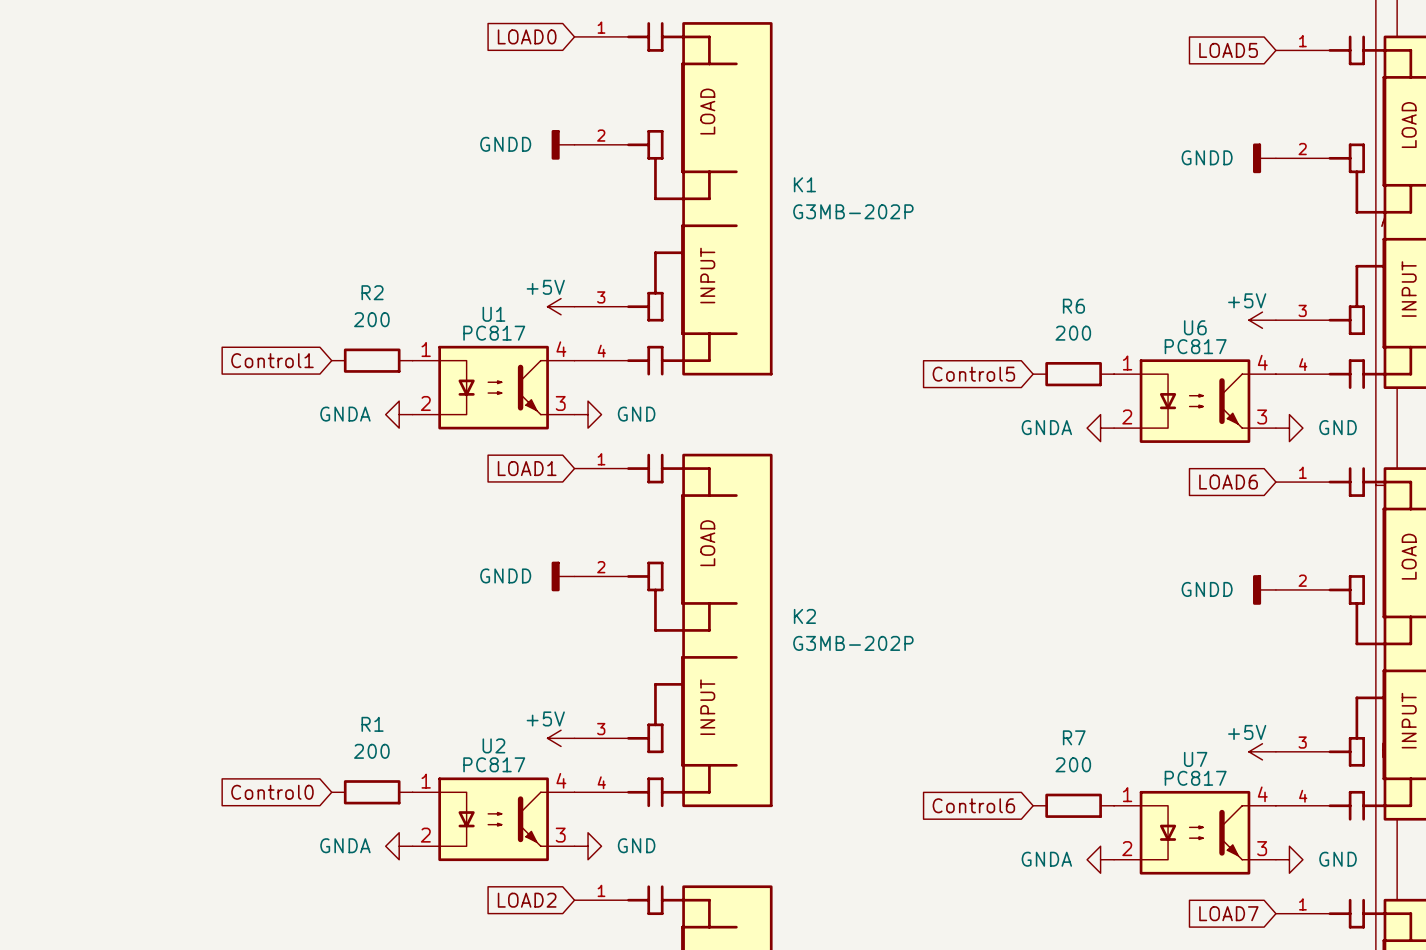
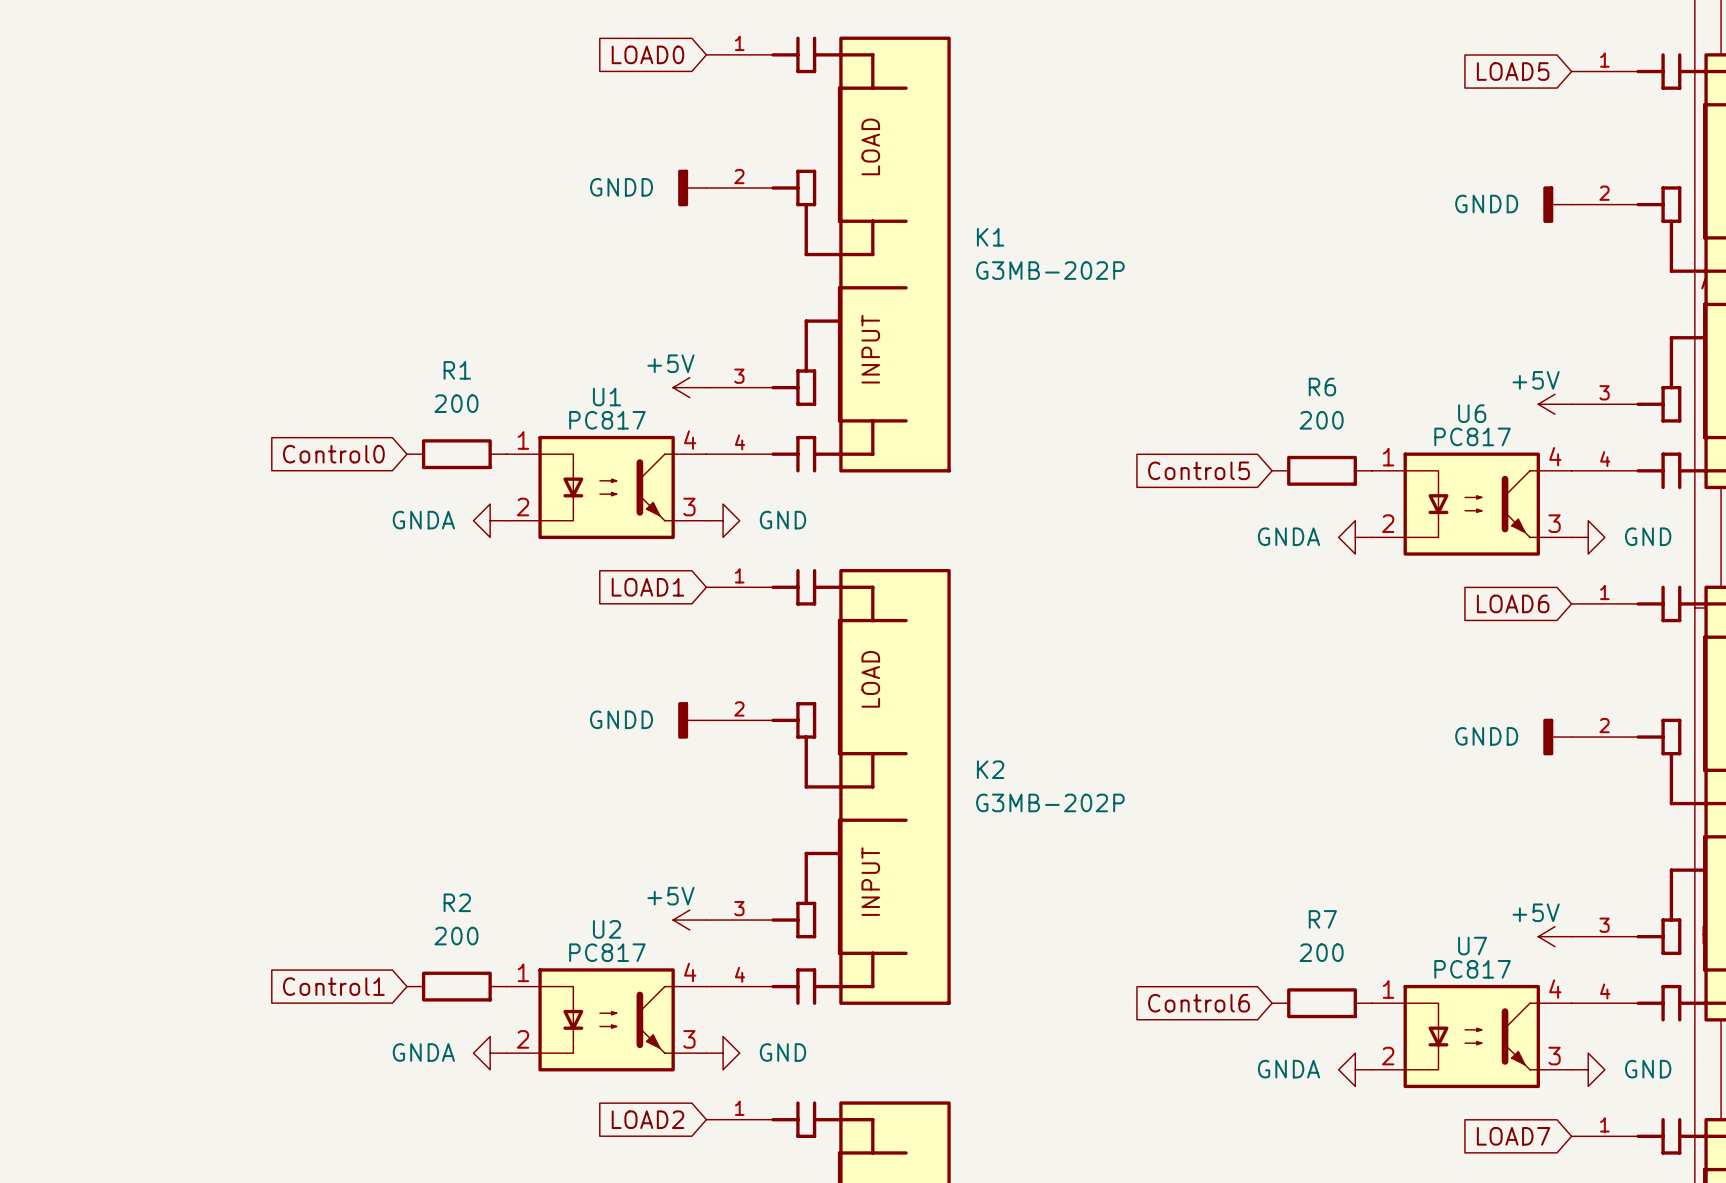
R2 name: R2 (372, 292) -> R1 (457, 370)
global label: Control1 (272, 360) -> Control0 (333, 454)
R1 name: R1 (372, 724) -> R2 (457, 902)
global label: Control0 (272, 792) -> Control1 (333, 986)

